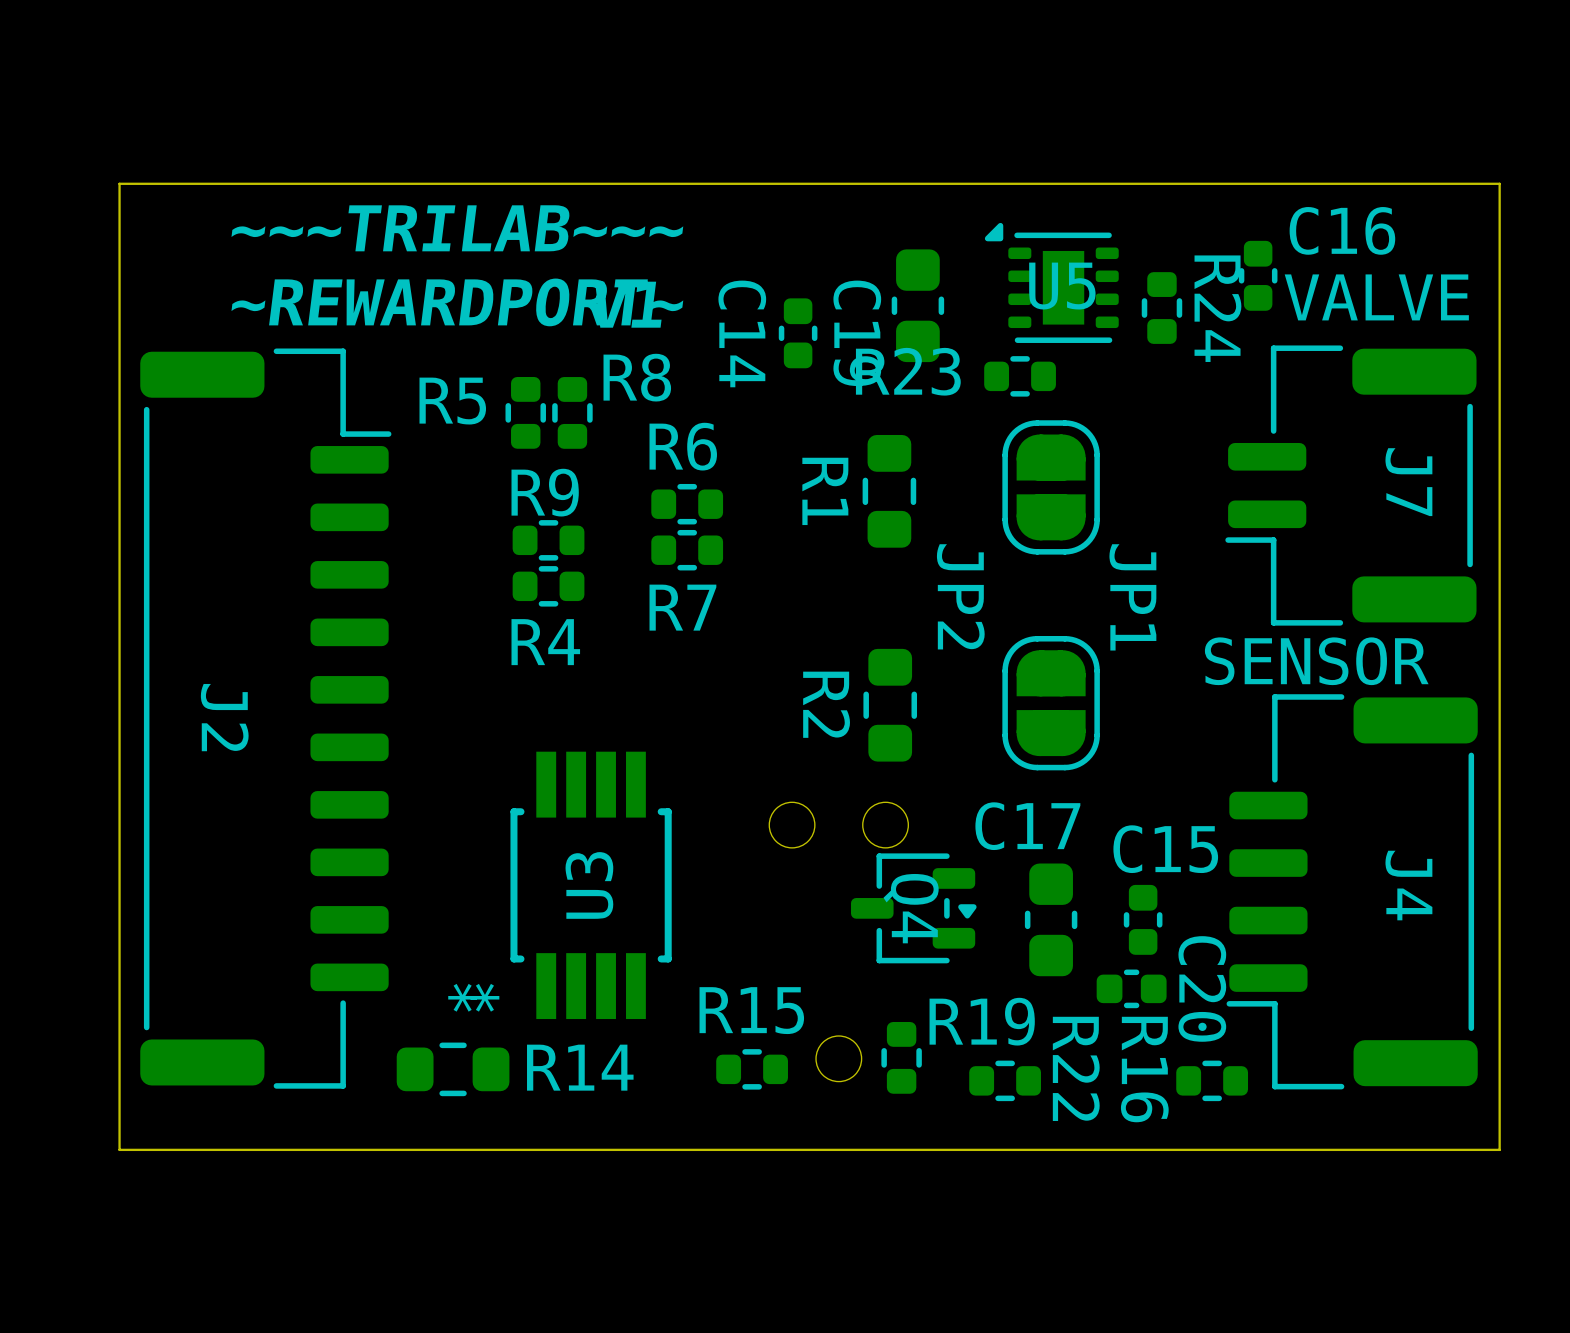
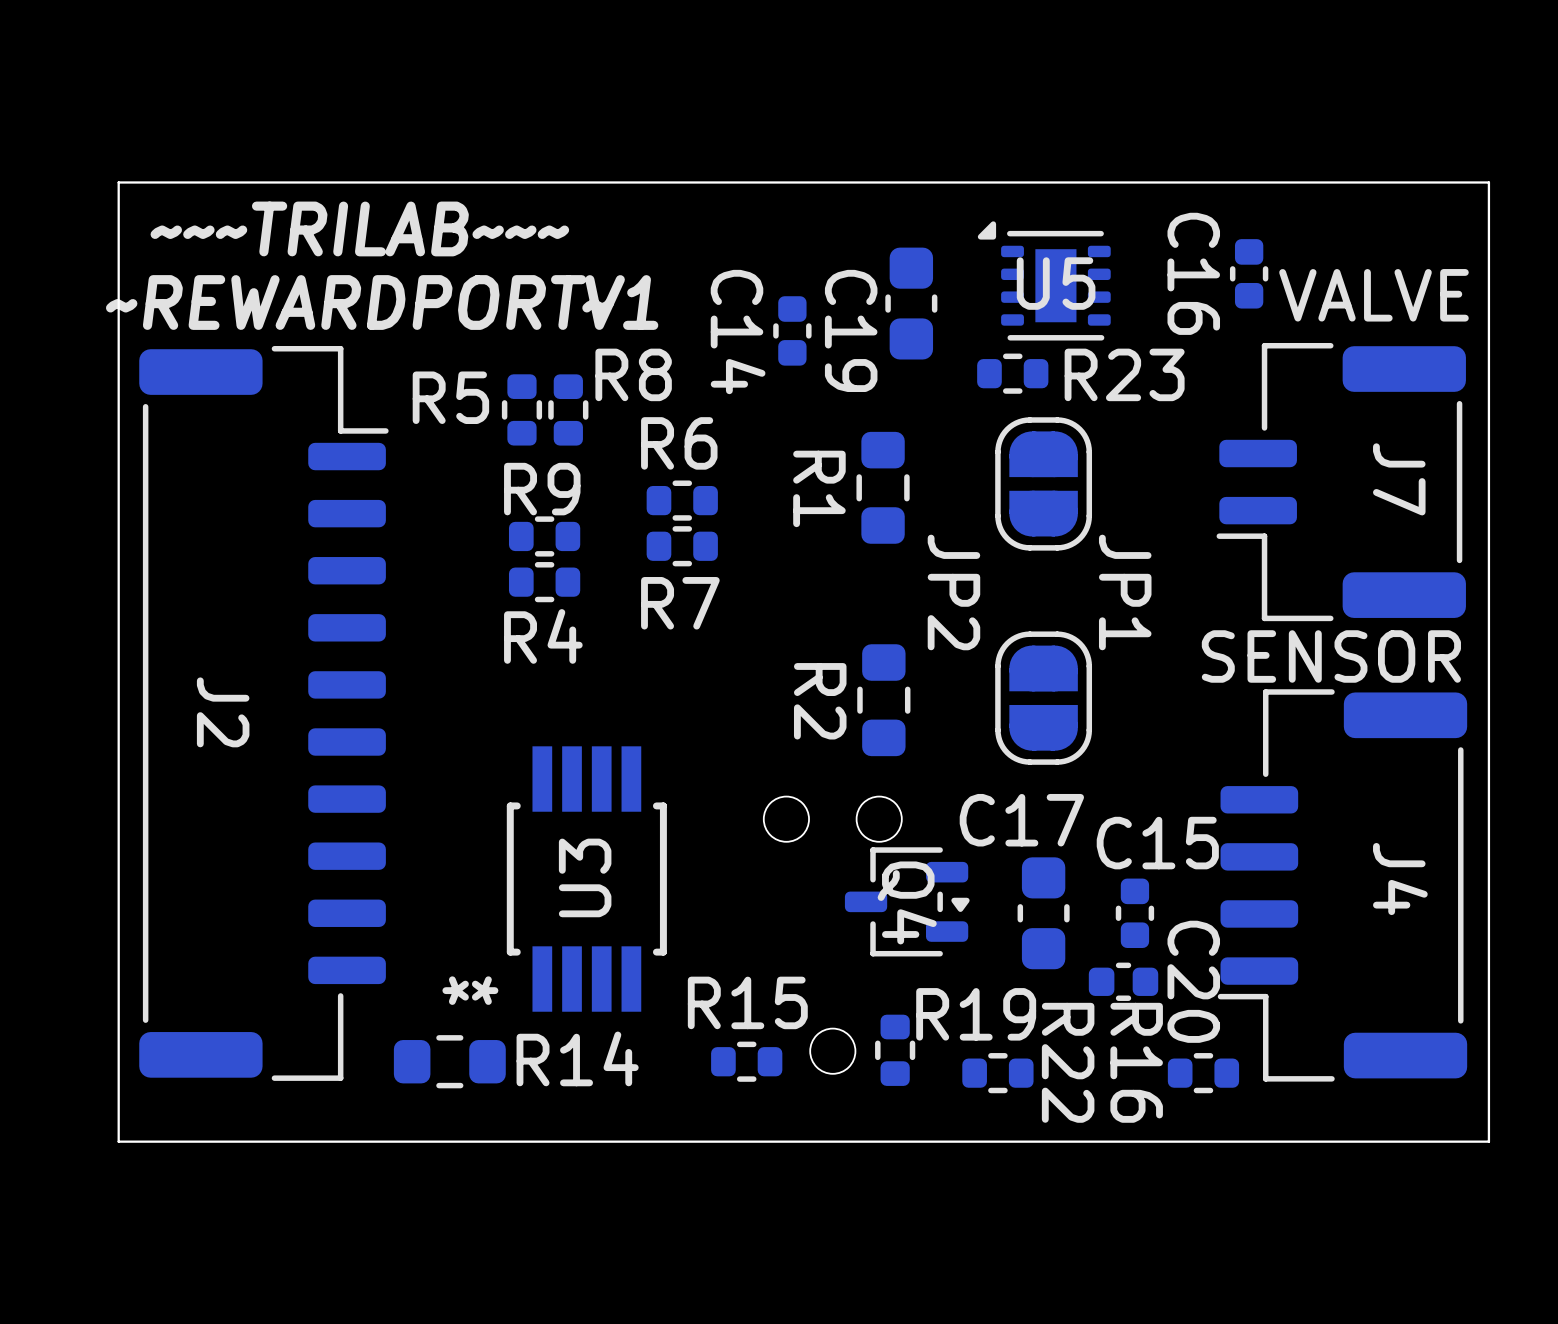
text position: ~~~TRILAB~~~ (457, 228) -> ~~~TRILAB~~~ (359, 228)
C16 name rotation: 0° (1342, 230) -> 90° clockwise (1193, 273)
text position: ~REWARDPORT~ (457, 302) -> ~REWARDPORT~ (359, 302)
R24: (1161, 308) -> none
R23 name position: R23 (908, 371) -> R23 (1124, 374)

